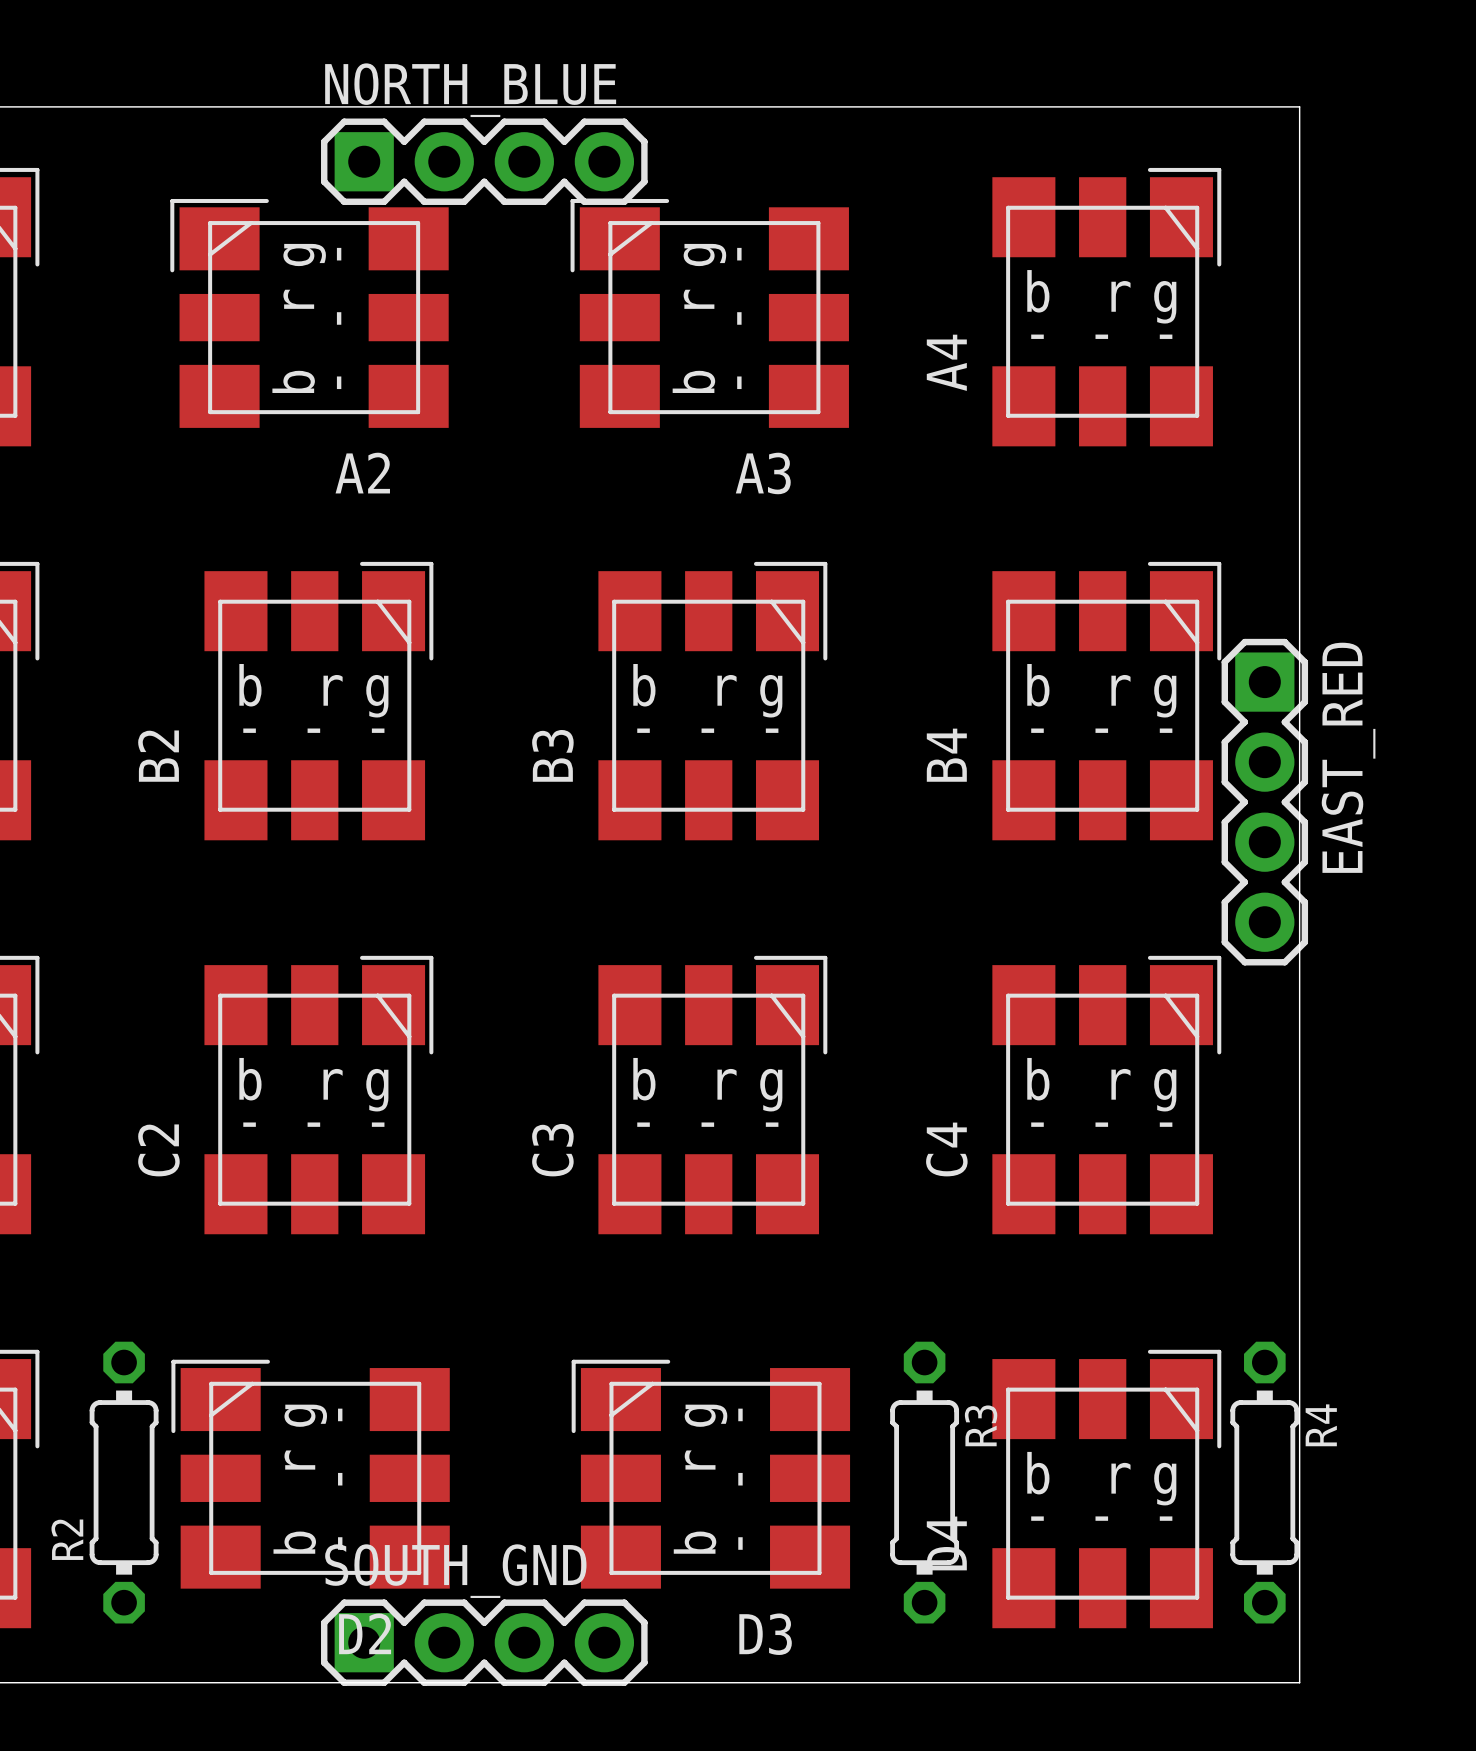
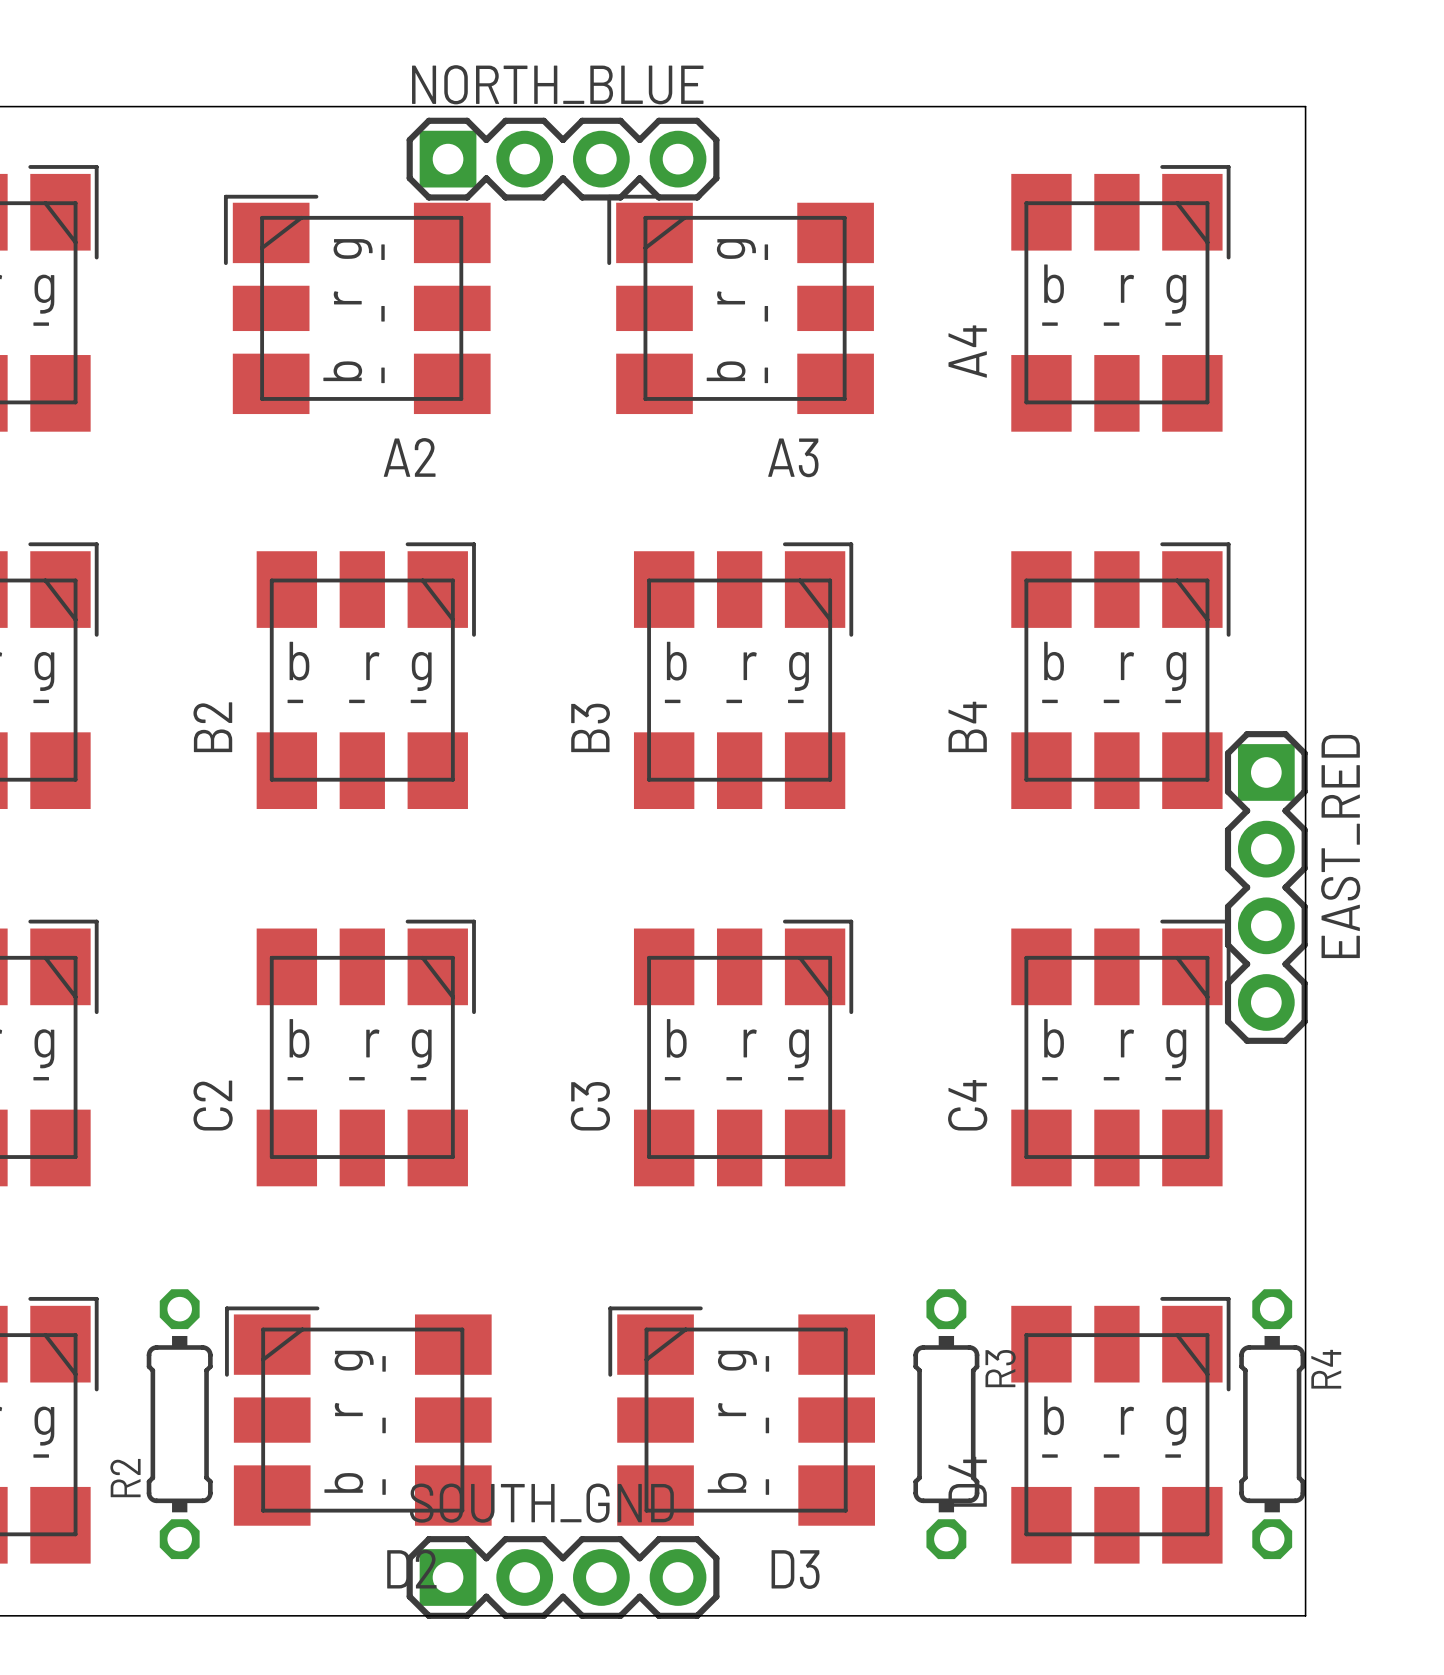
NORTH_BLUE position: (484, 161) -> (563, 159)
EAST_RED position: (1264, 802) -> (1266, 887)
SOUTH_GND position: (484, 1642) -> (563, 1577)

